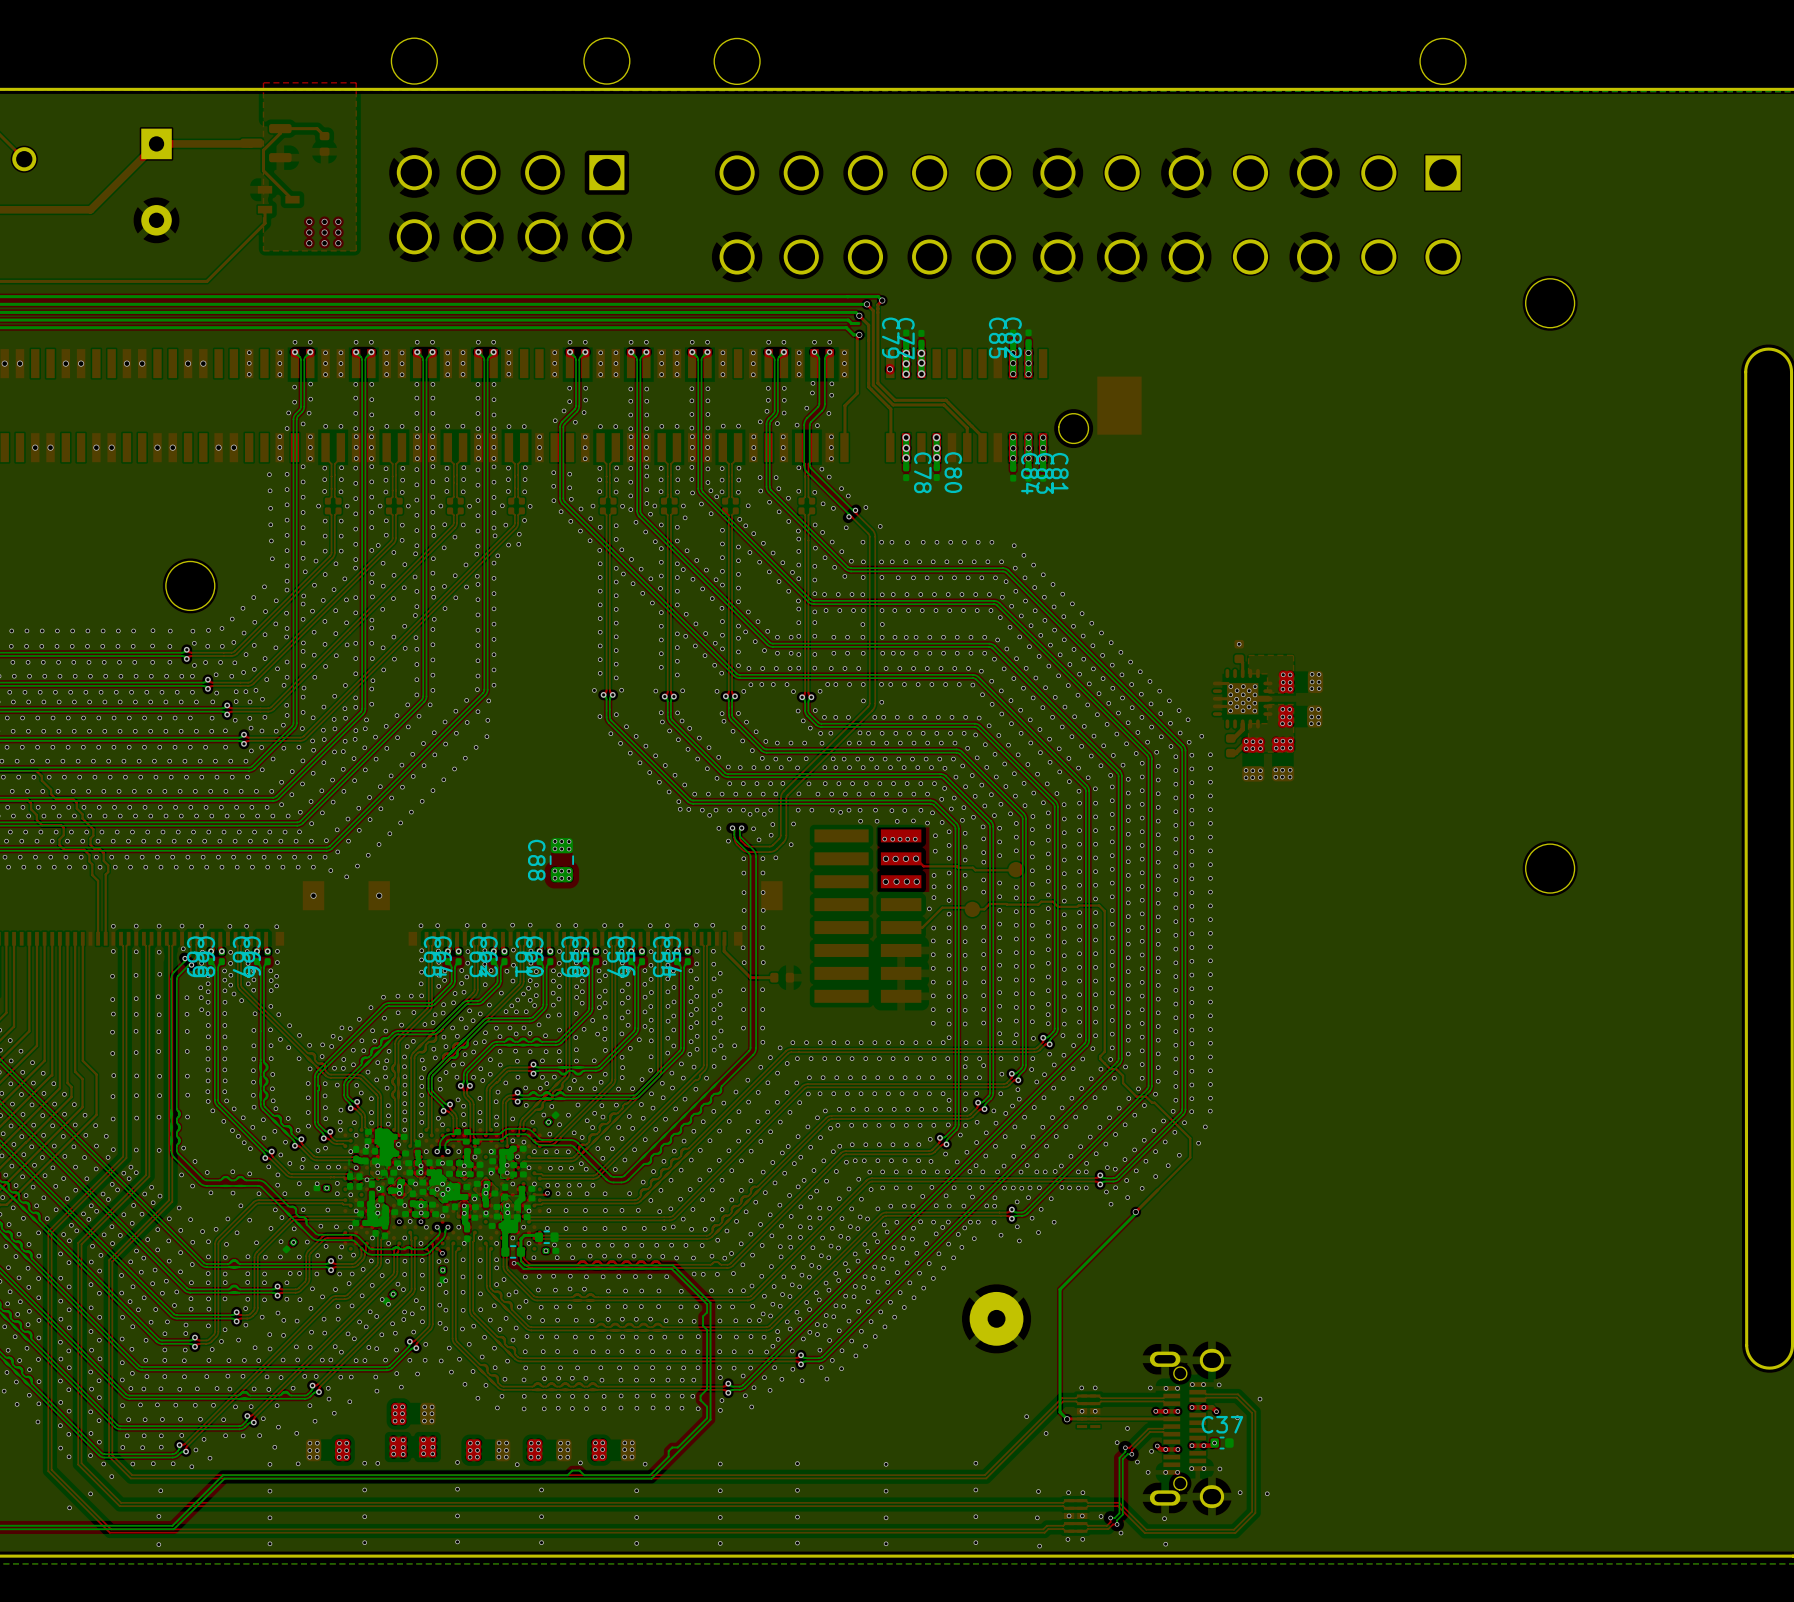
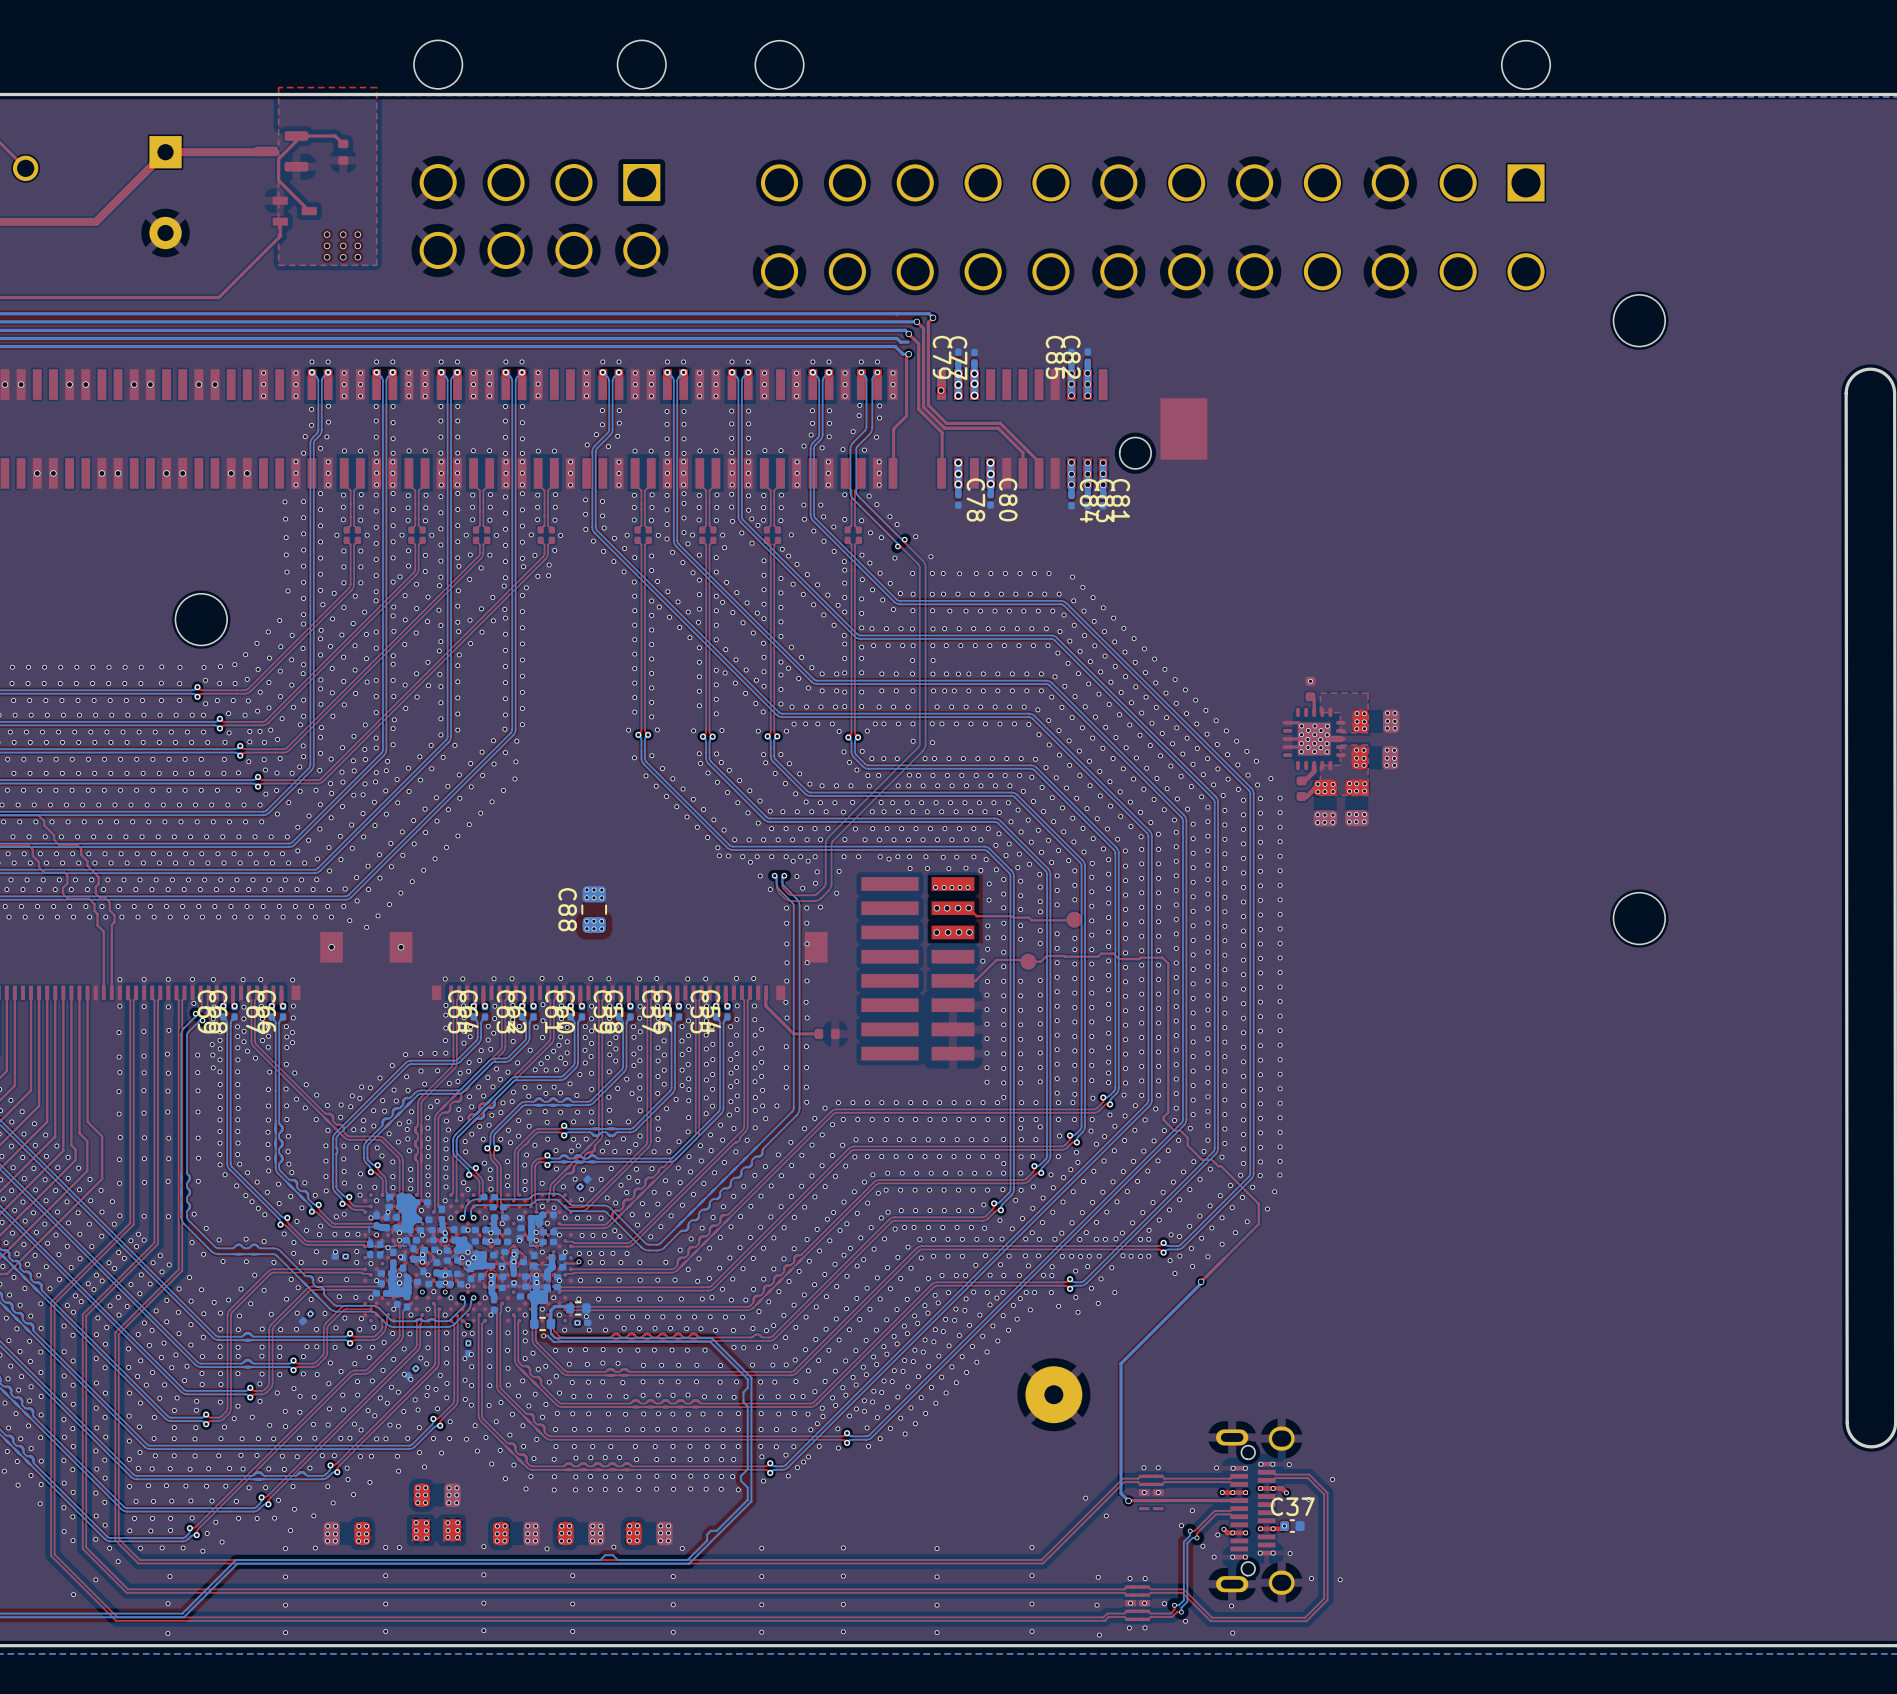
via: (819, 1208) -> none
via: (860, 1216) -> none
via: (809, 1217) -> none
via: (800, 1226) -> none
via: (850, 1226) -> none
via: (840, 1236) -> none
via: (789, 1237) -> none
via: (780, 1246) -> none
via: (831, 1246) -> none
via: (821, 1255) -> none
via: (811, 1265) -> none
via: (801, 1275) -> none
via: (792, 1284) -> none
via: (782, 1294) -> none
via: (772, 1304) -> none
via: (763, 1313) -> none
via: (841, 1368) -> none
via: (781, 1379) -> none
via: (826, 1379) -> none
via: (802, 1380) -> none
via: none -> (803, 1462)
via: (770, 1390) -> none
via: (751, 1406) -> none
via: (720, 1410) -> none

